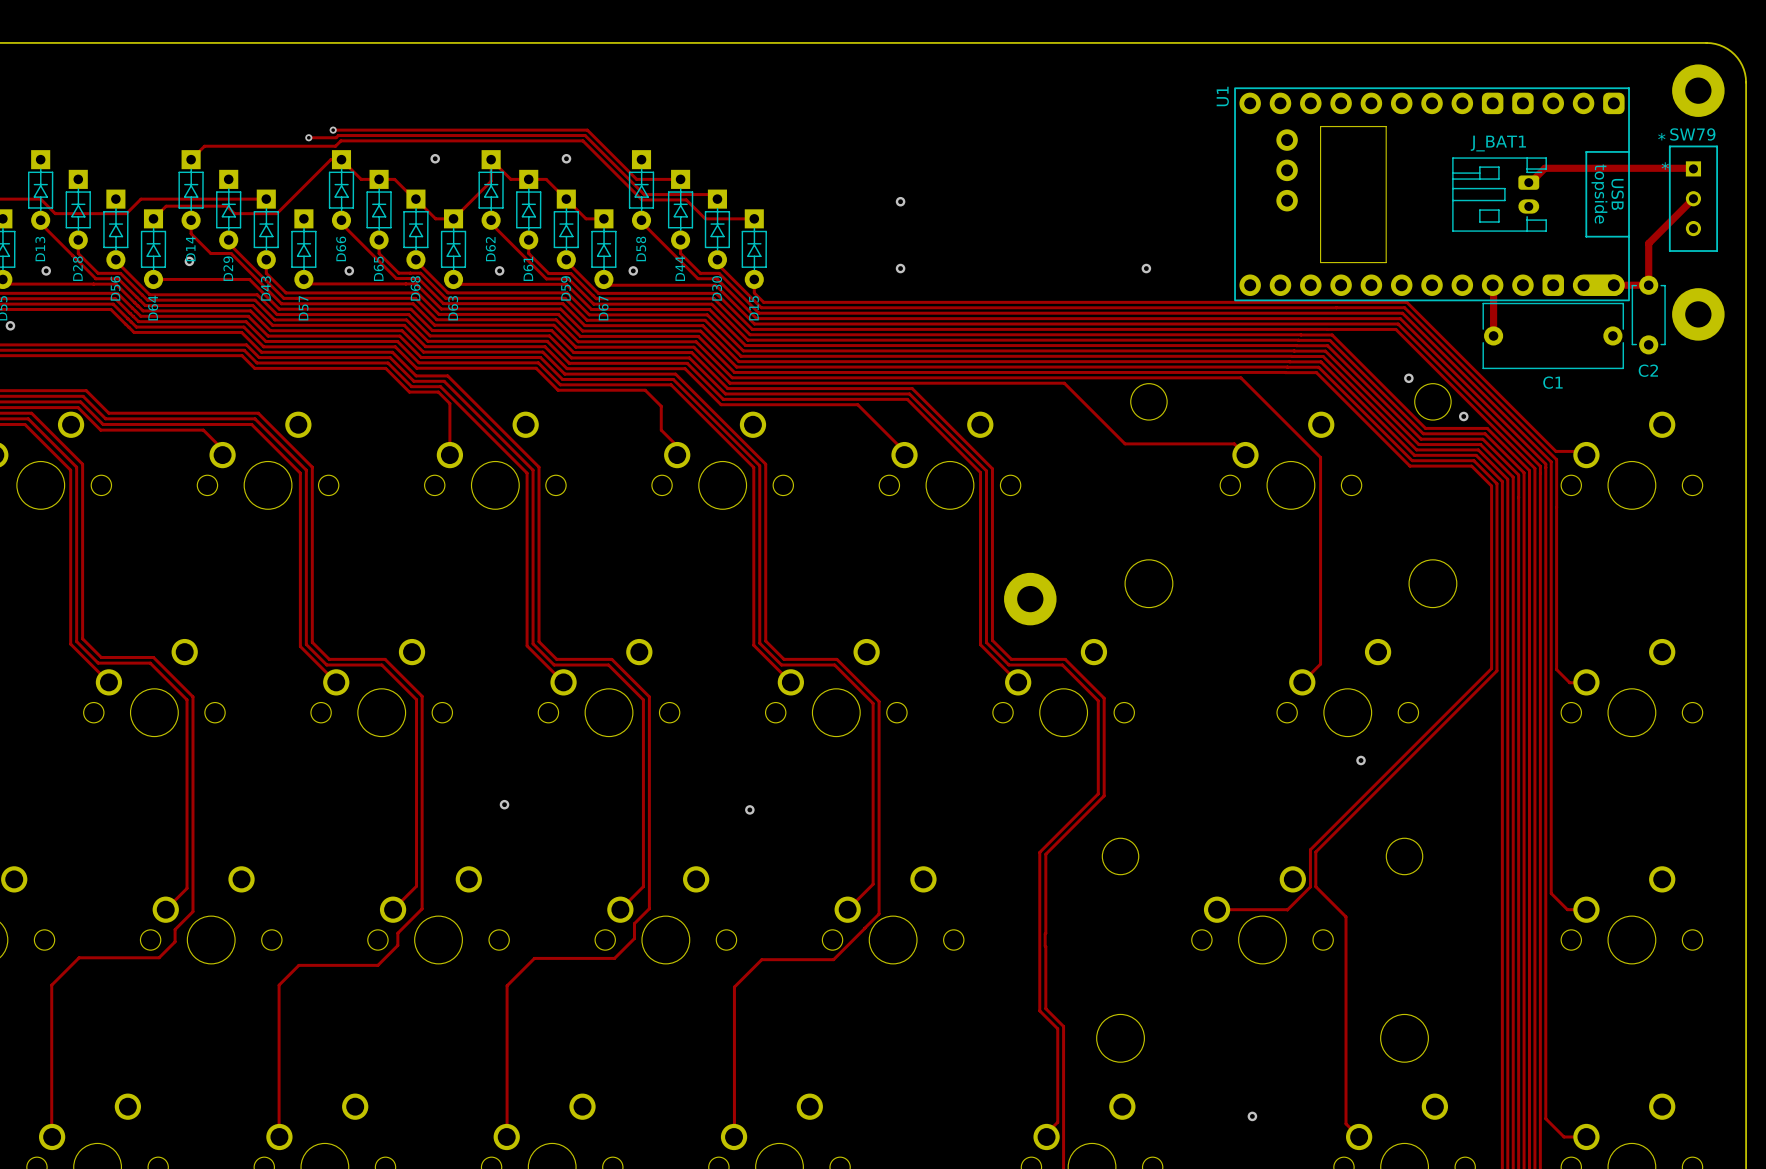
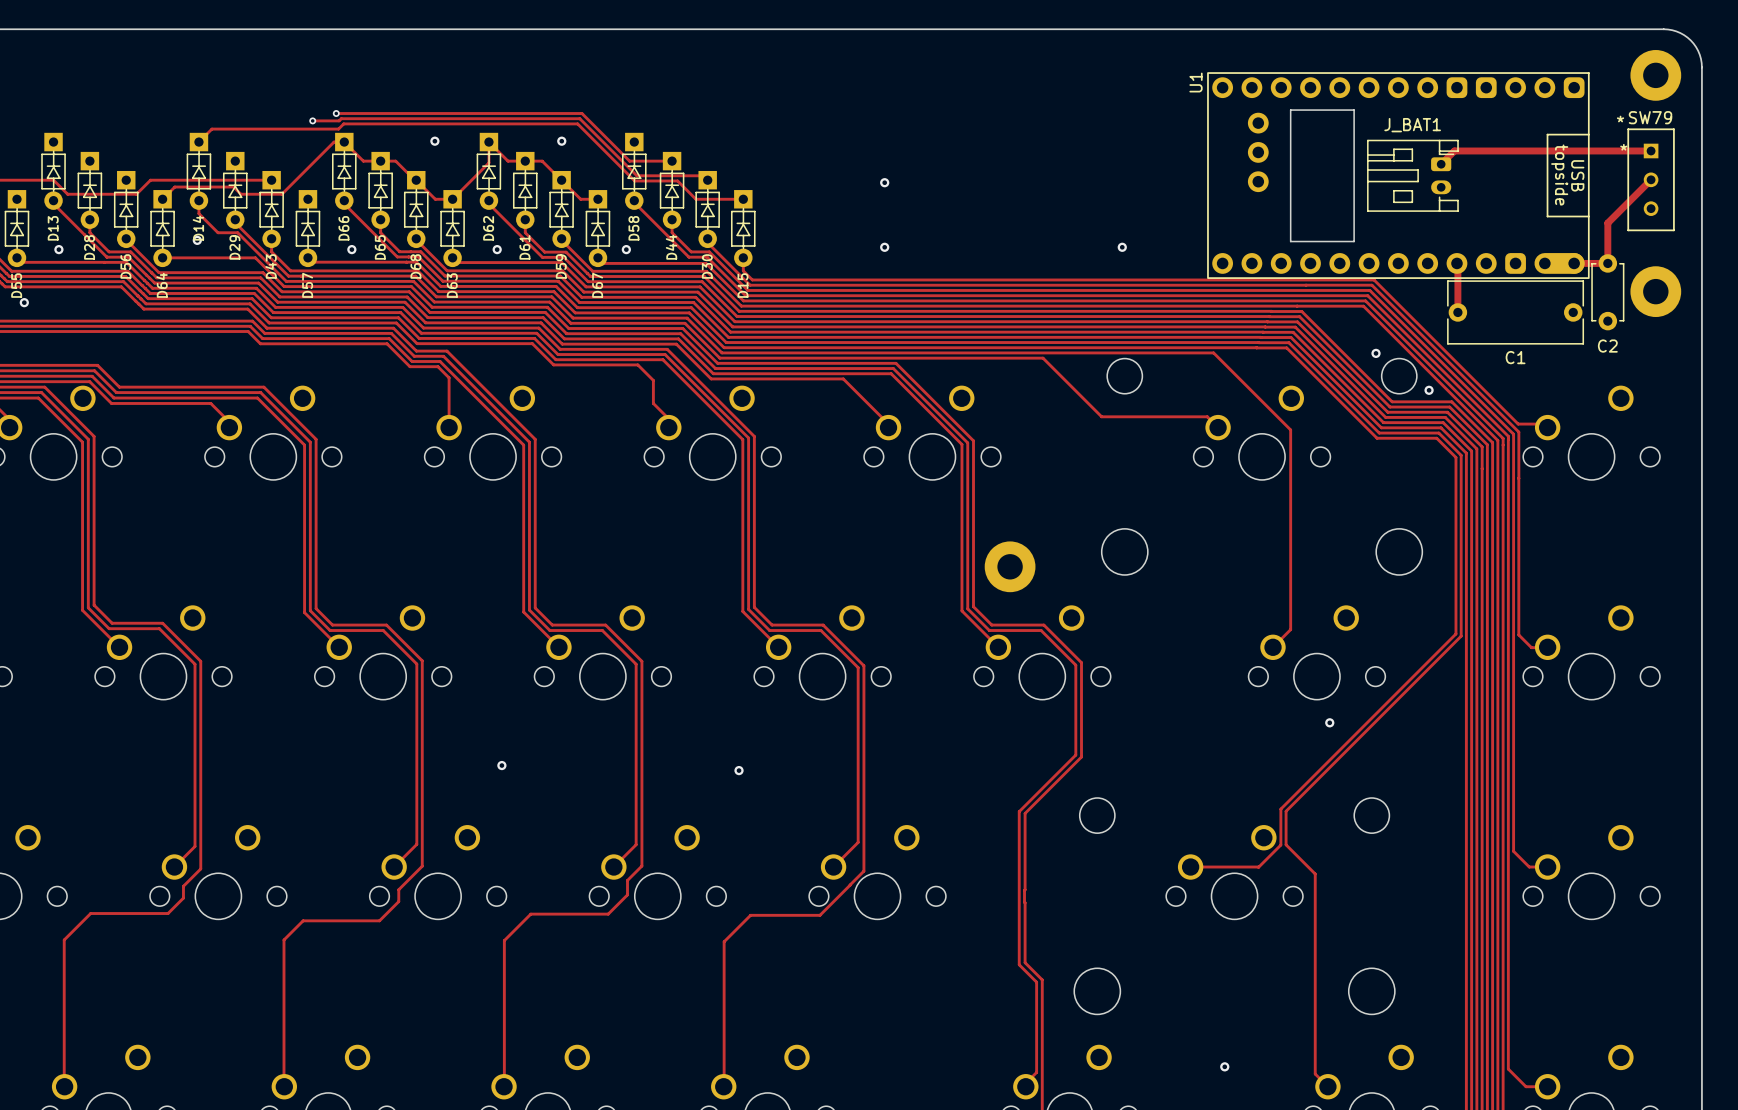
track: (1693, 168) (1544, 168) (1528, 182) -> (1651, 150) (1454, 150) (1441, 164)
J_BAT1 position: (1499, 194) -> (1412, 175)

